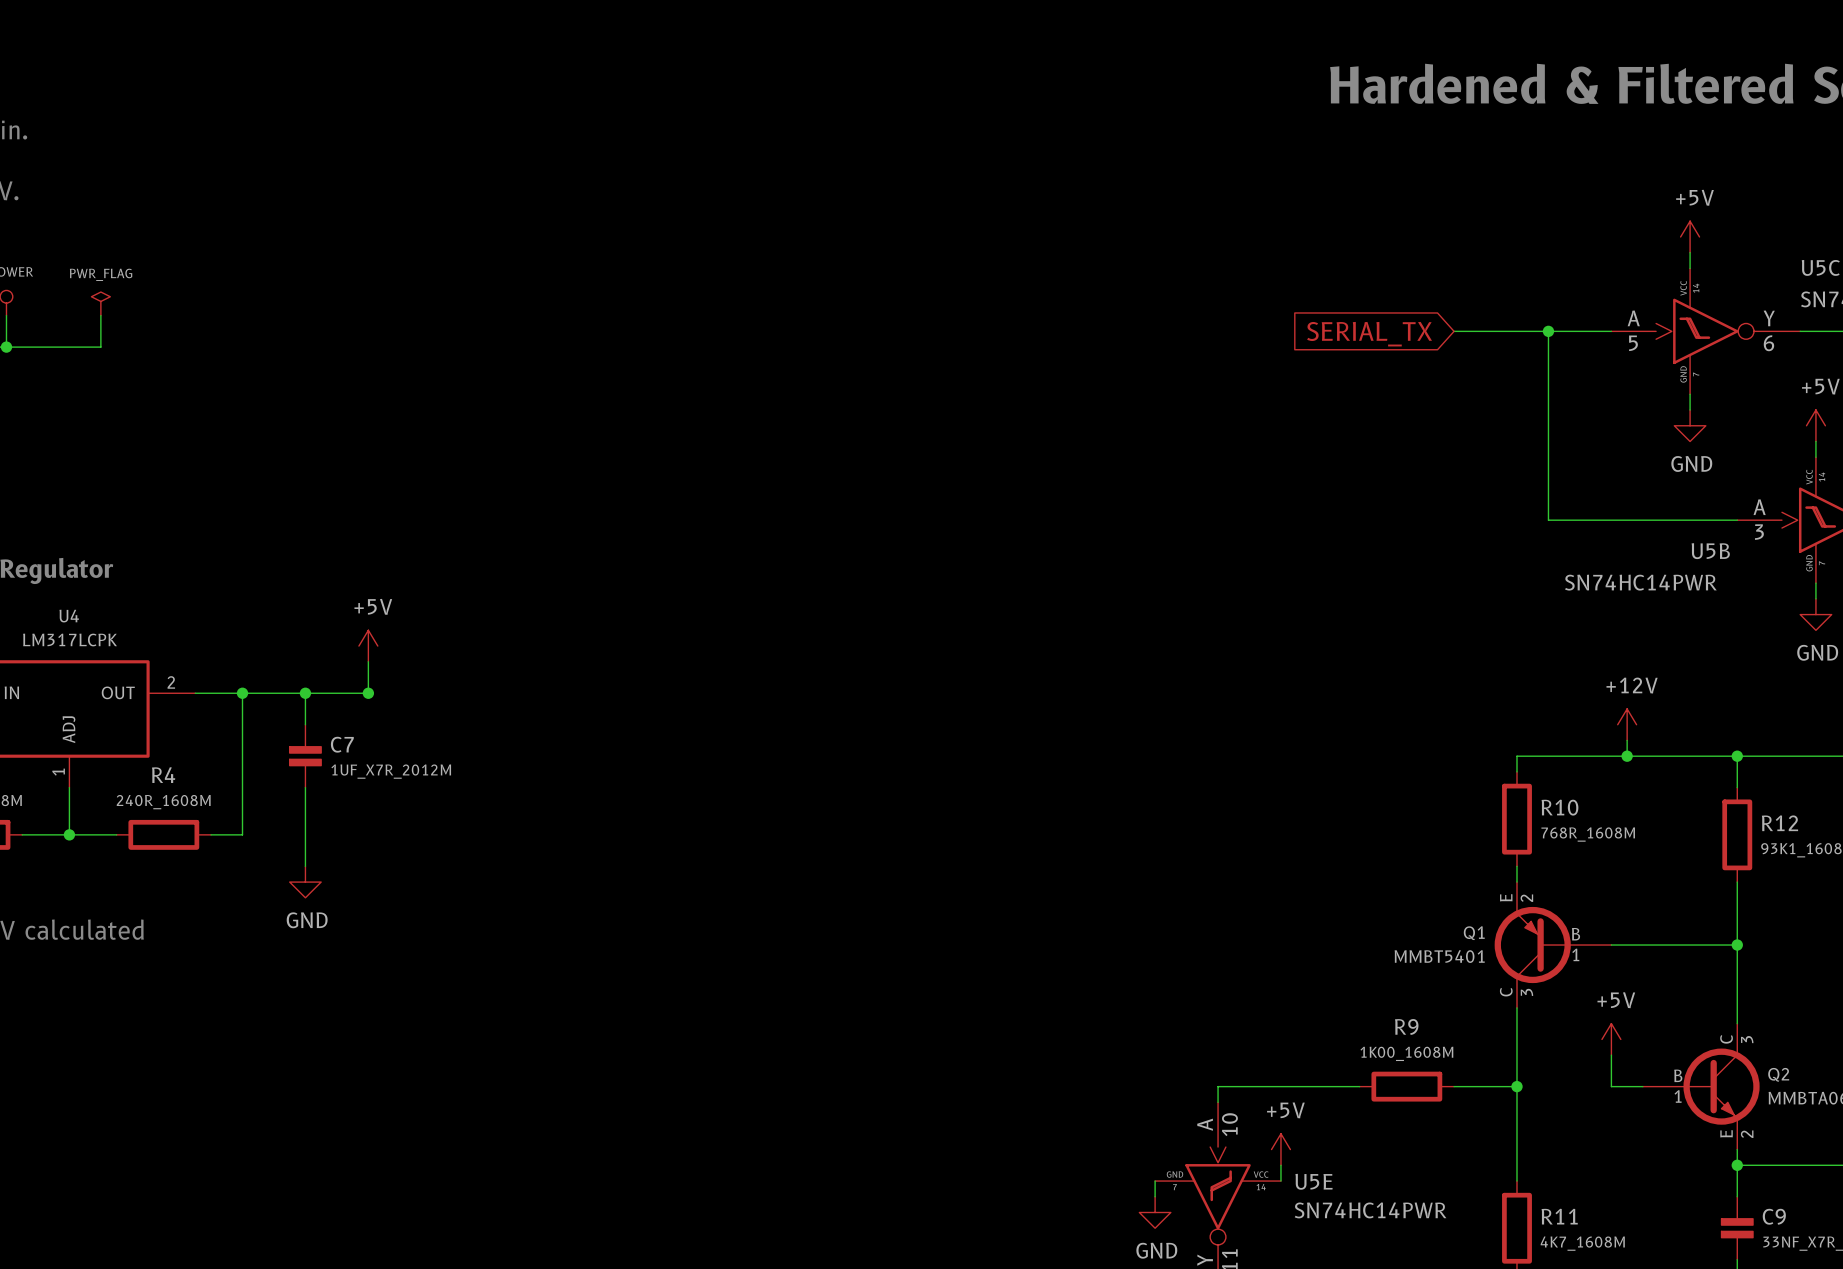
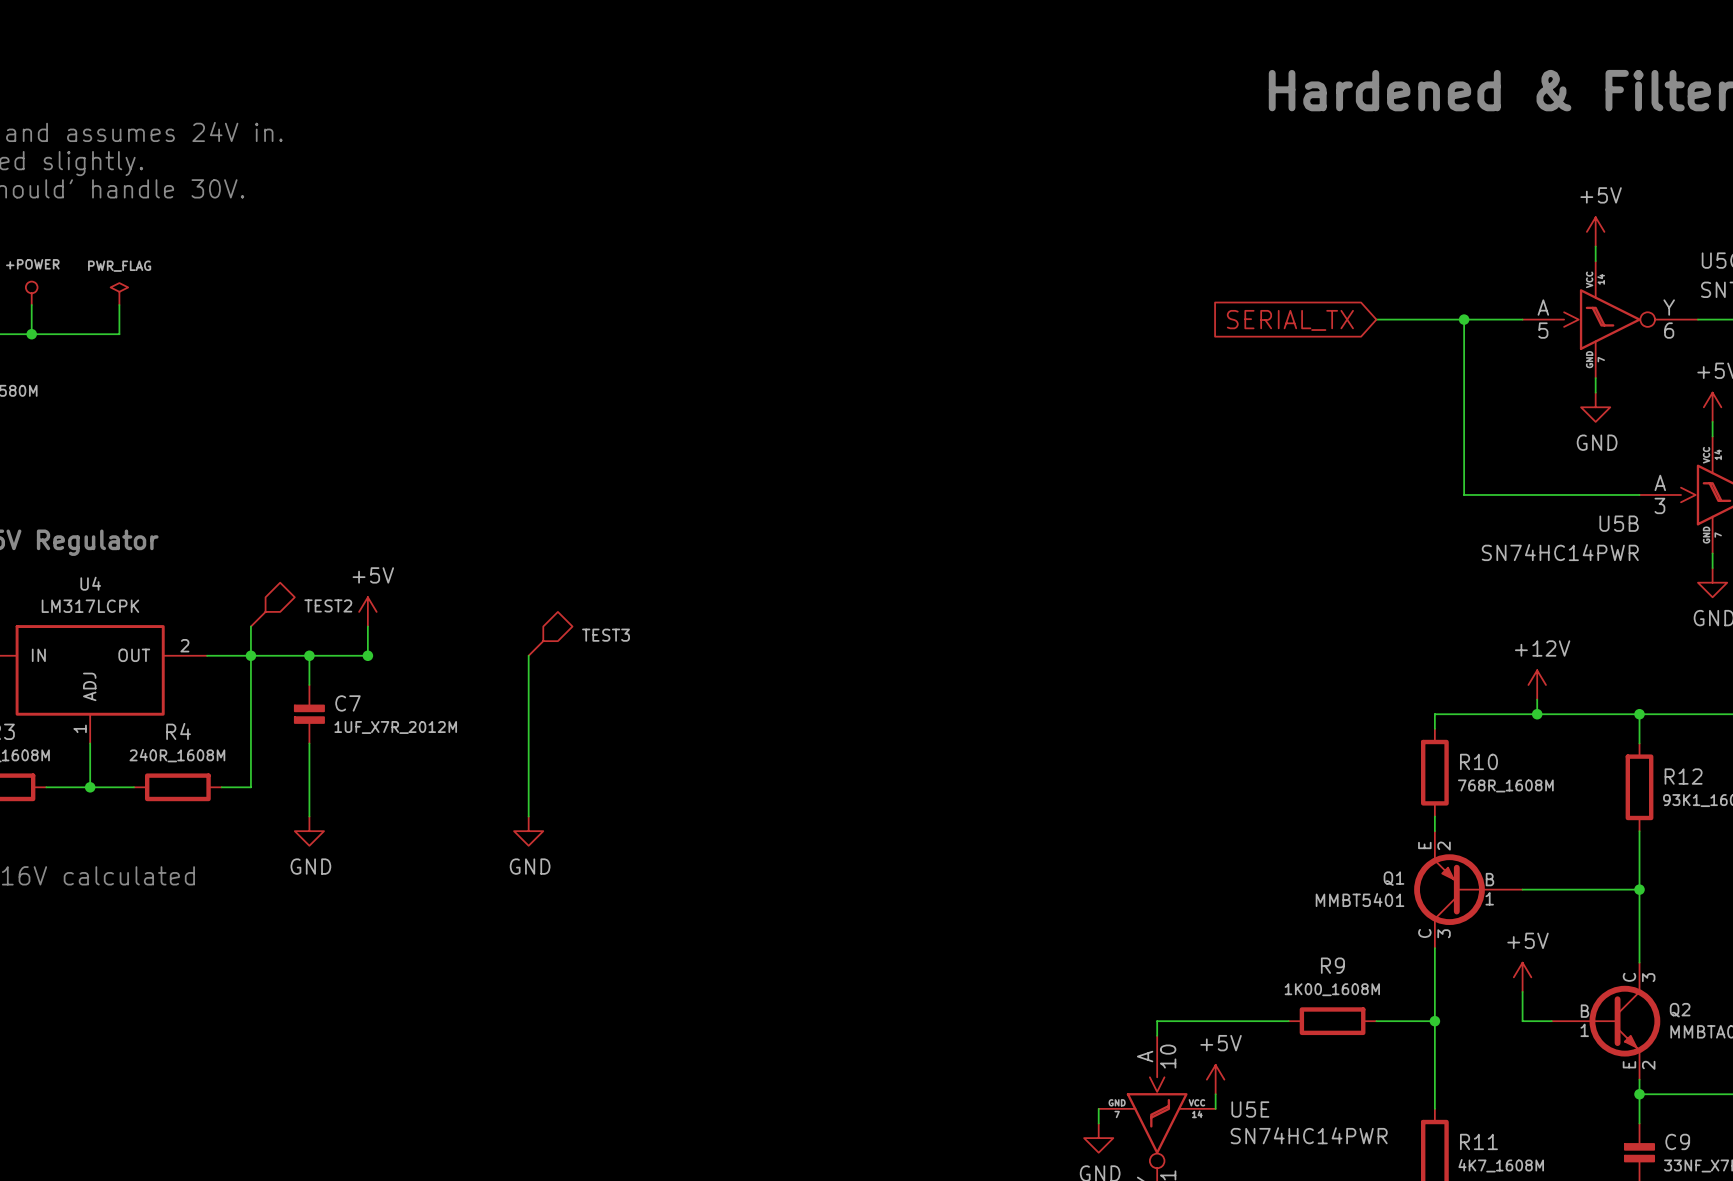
TEST2: none -> (272, 604)
wire: none -> (250, 626) (250, 655)
TEST3: none -> (550, 633)
wire: none -> (528, 655) (528, 816)
power symbol: none -> GND (528, 831)

